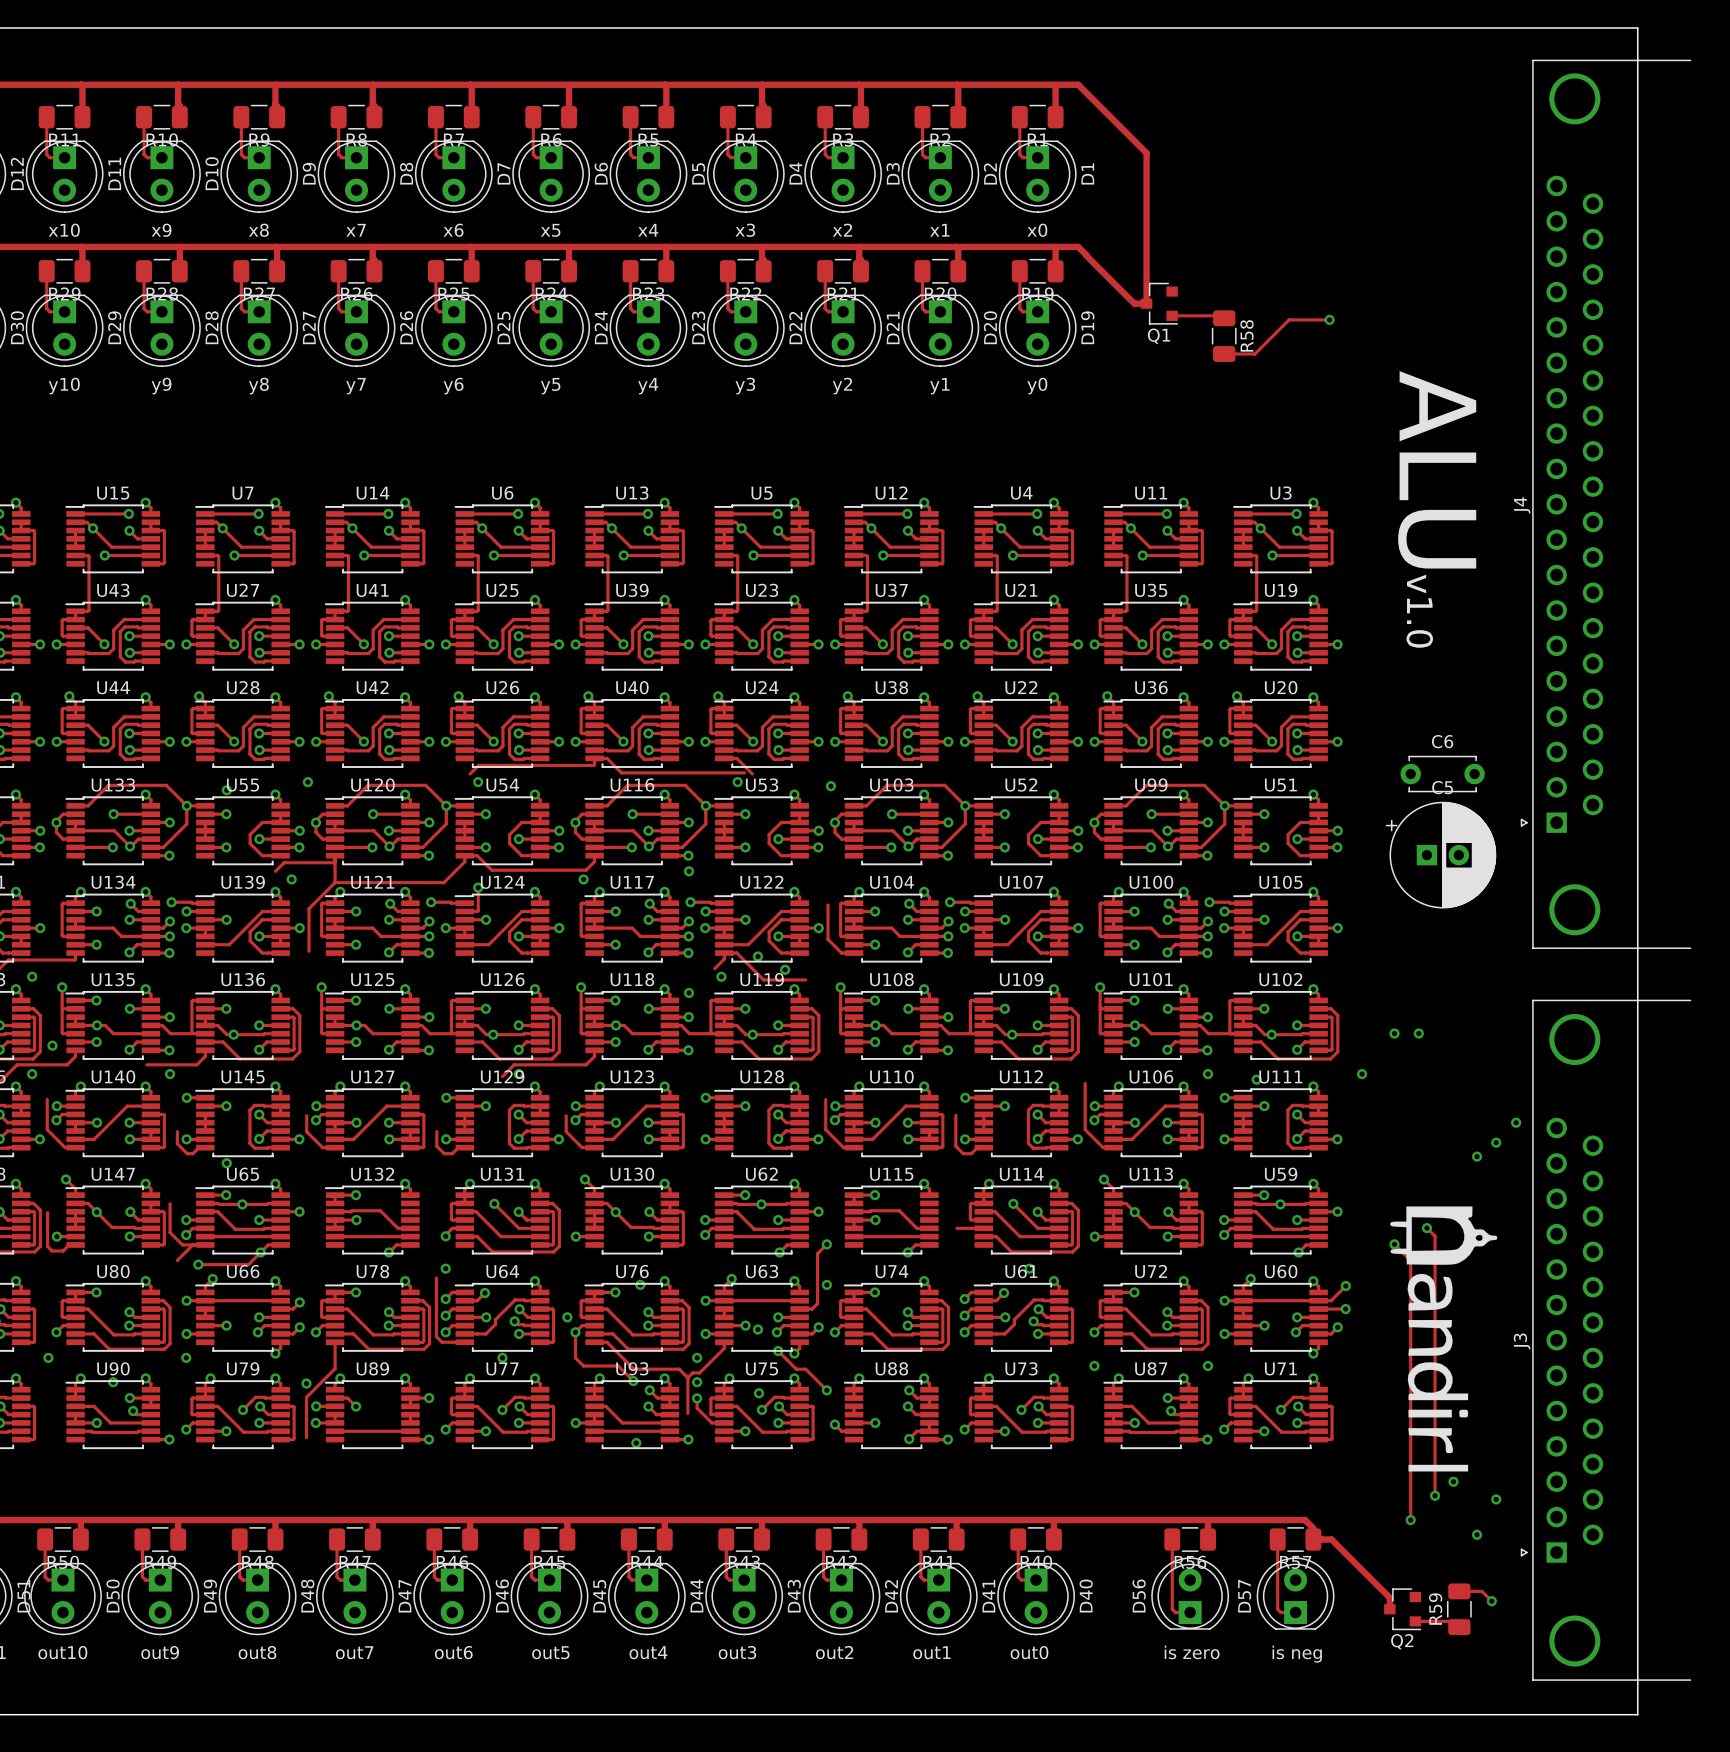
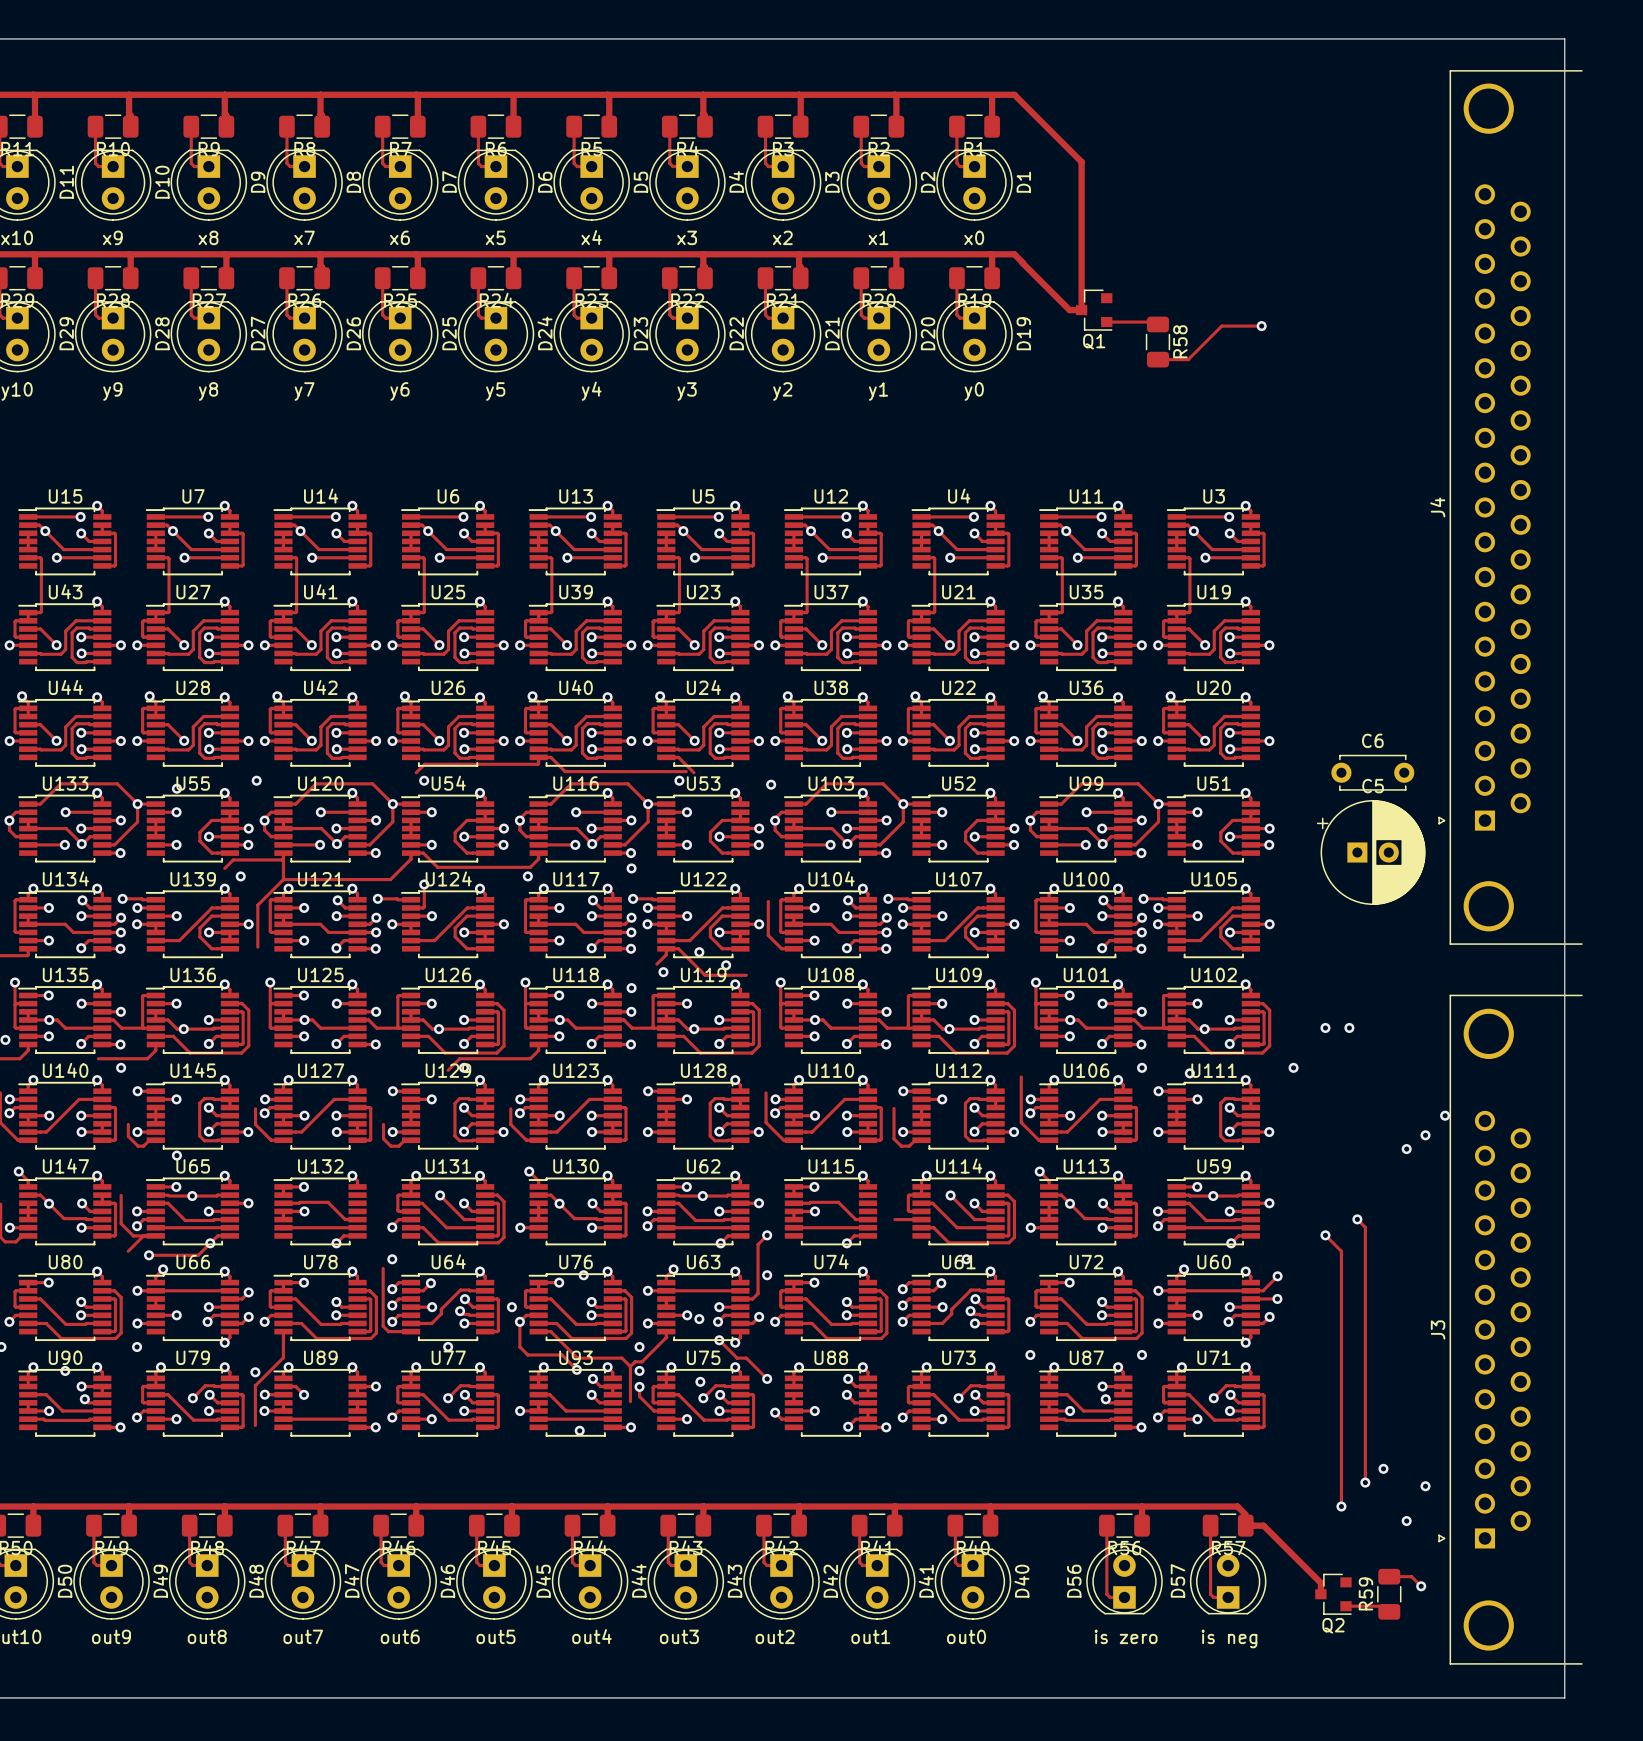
J4 footprint: [1520, 59, 1692, 949] -> [1438, 70, 1583, 945]
text: ALU (1437, 469) -> none
text: v1.0 (1419, 611) -> none
J3 footprint: [1520, 999, 1692, 1681] -> [1438, 994, 1583, 1665]
drawing: [1390, 1206, 1498, 1472] -> none

